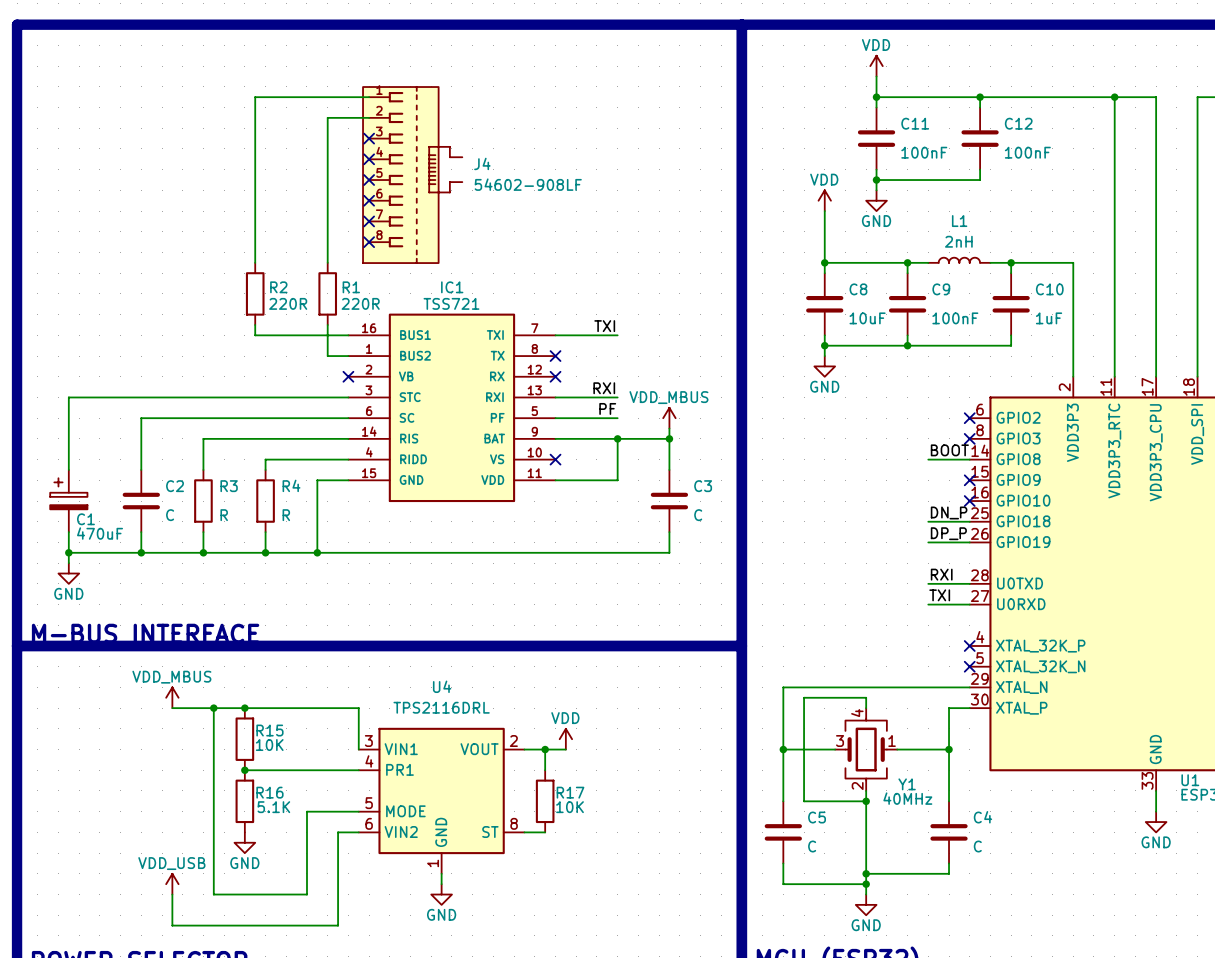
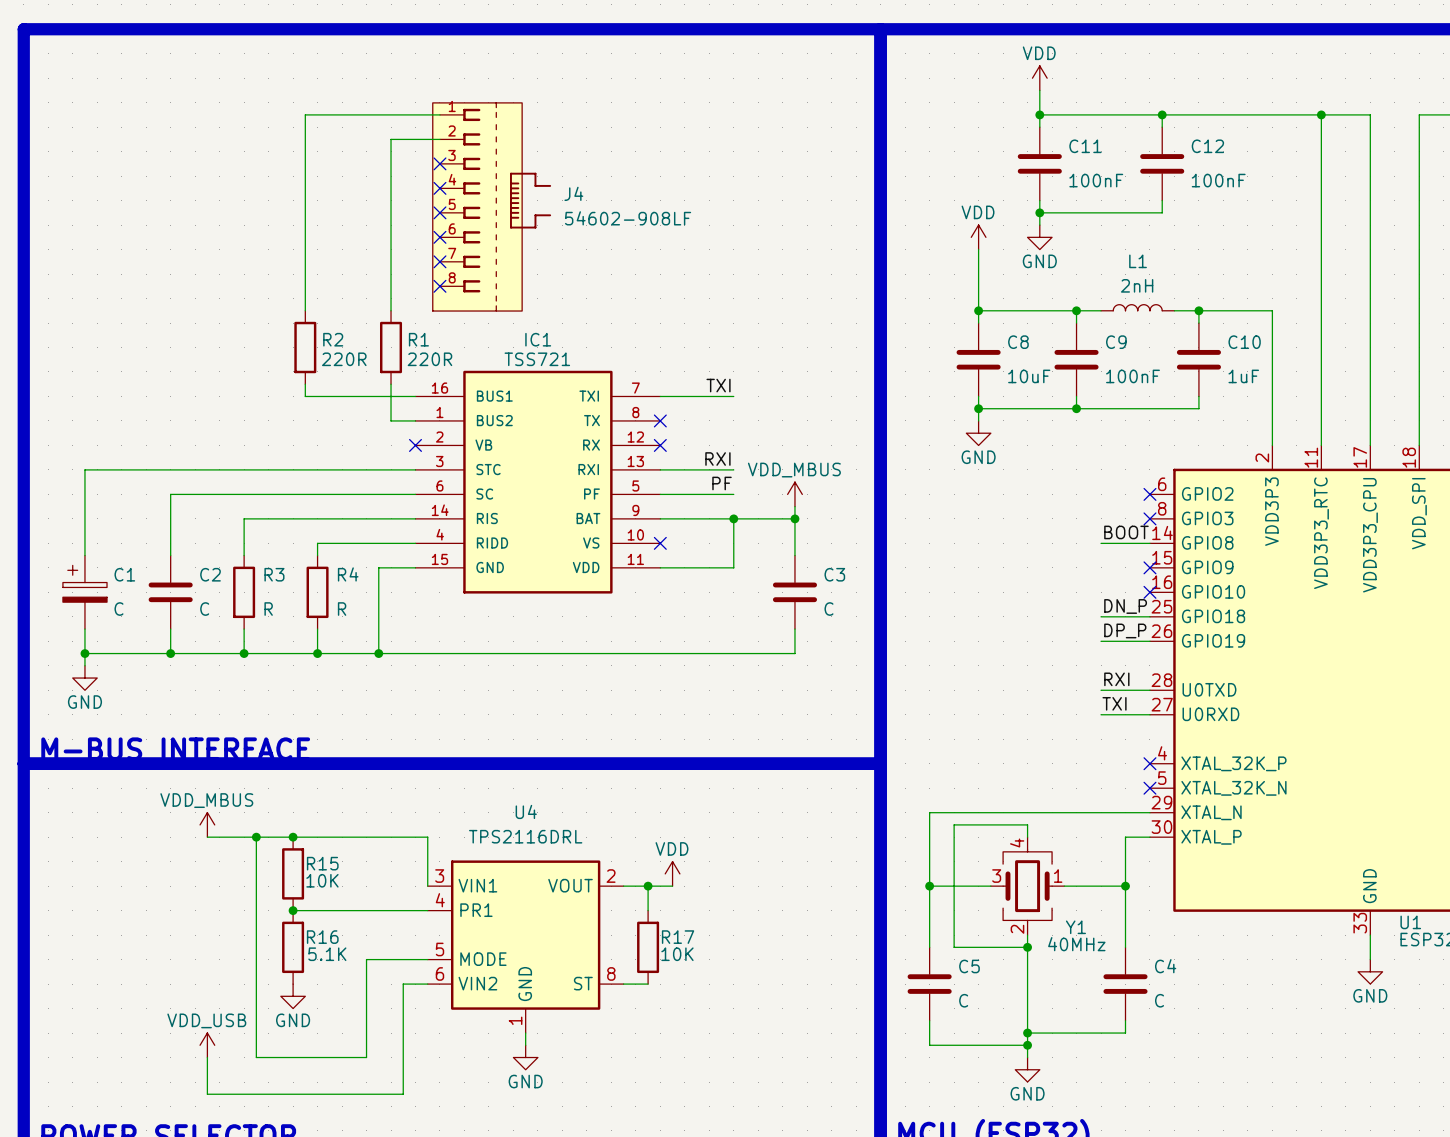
C1 name position: C1 (85, 519) -> C1 (124, 574)
C1 value: 470uF (100, 533) -> C (118, 609)

